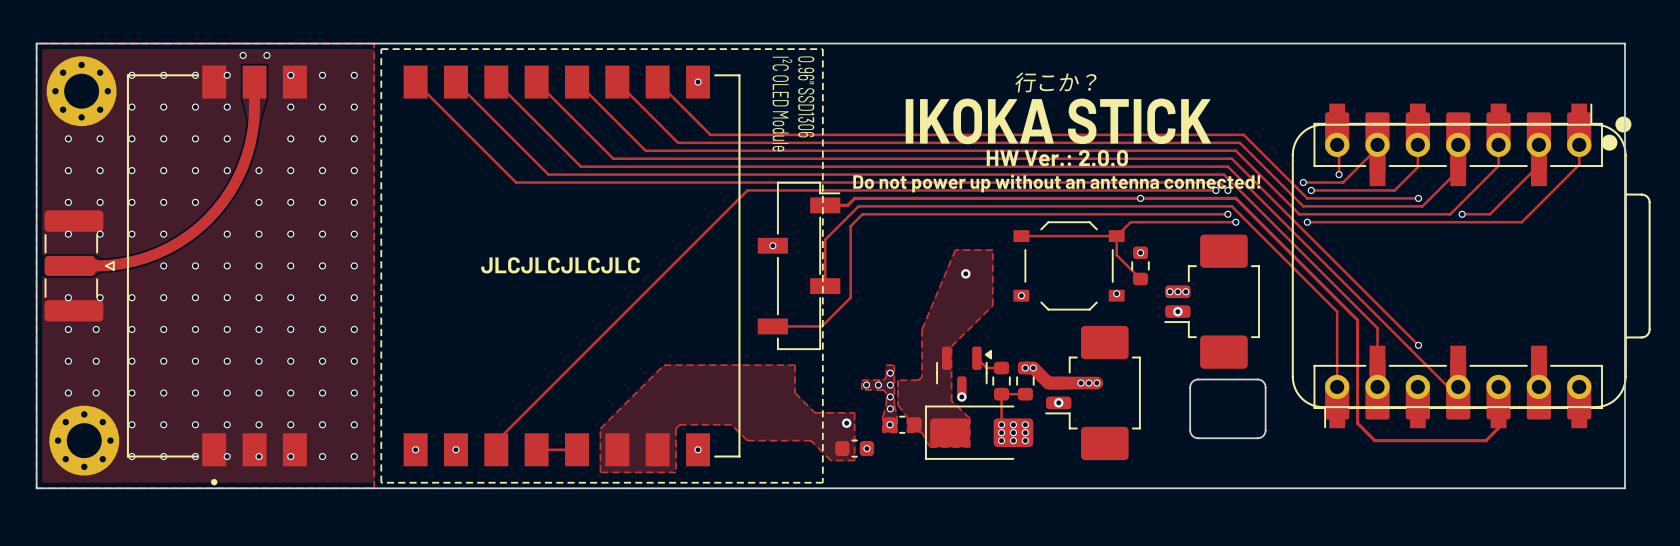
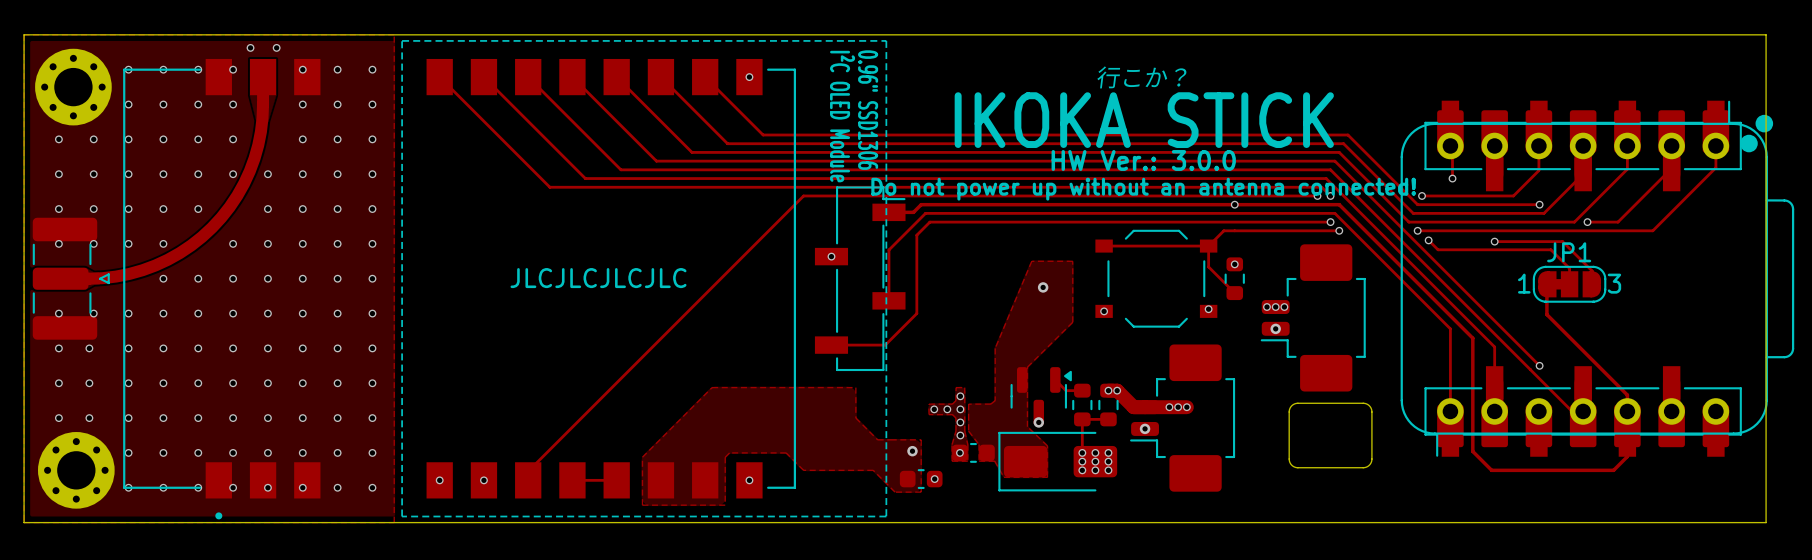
track: (1377, 148) (1343, 182) (1303, 182) -> none
text: HW Ver.: 2.0.0 (1057, 158) -> HW Ver.: 3.0.0 (1143, 160)
via: (1303, 182) -> none
track: none -> (1428, 240) (1438, 249) (1550, 249) (1569, 268) (1569, 284)
via: none -> (1428, 240)
track: none -> (1494, 241) (1562, 241) (1592, 271) (1592, 284)
via: none -> (1494, 241)
track: none -> (1546, 284) (1546, 314) (1627, 395) (1627, 411)
JP1: none -> (1569, 284)

